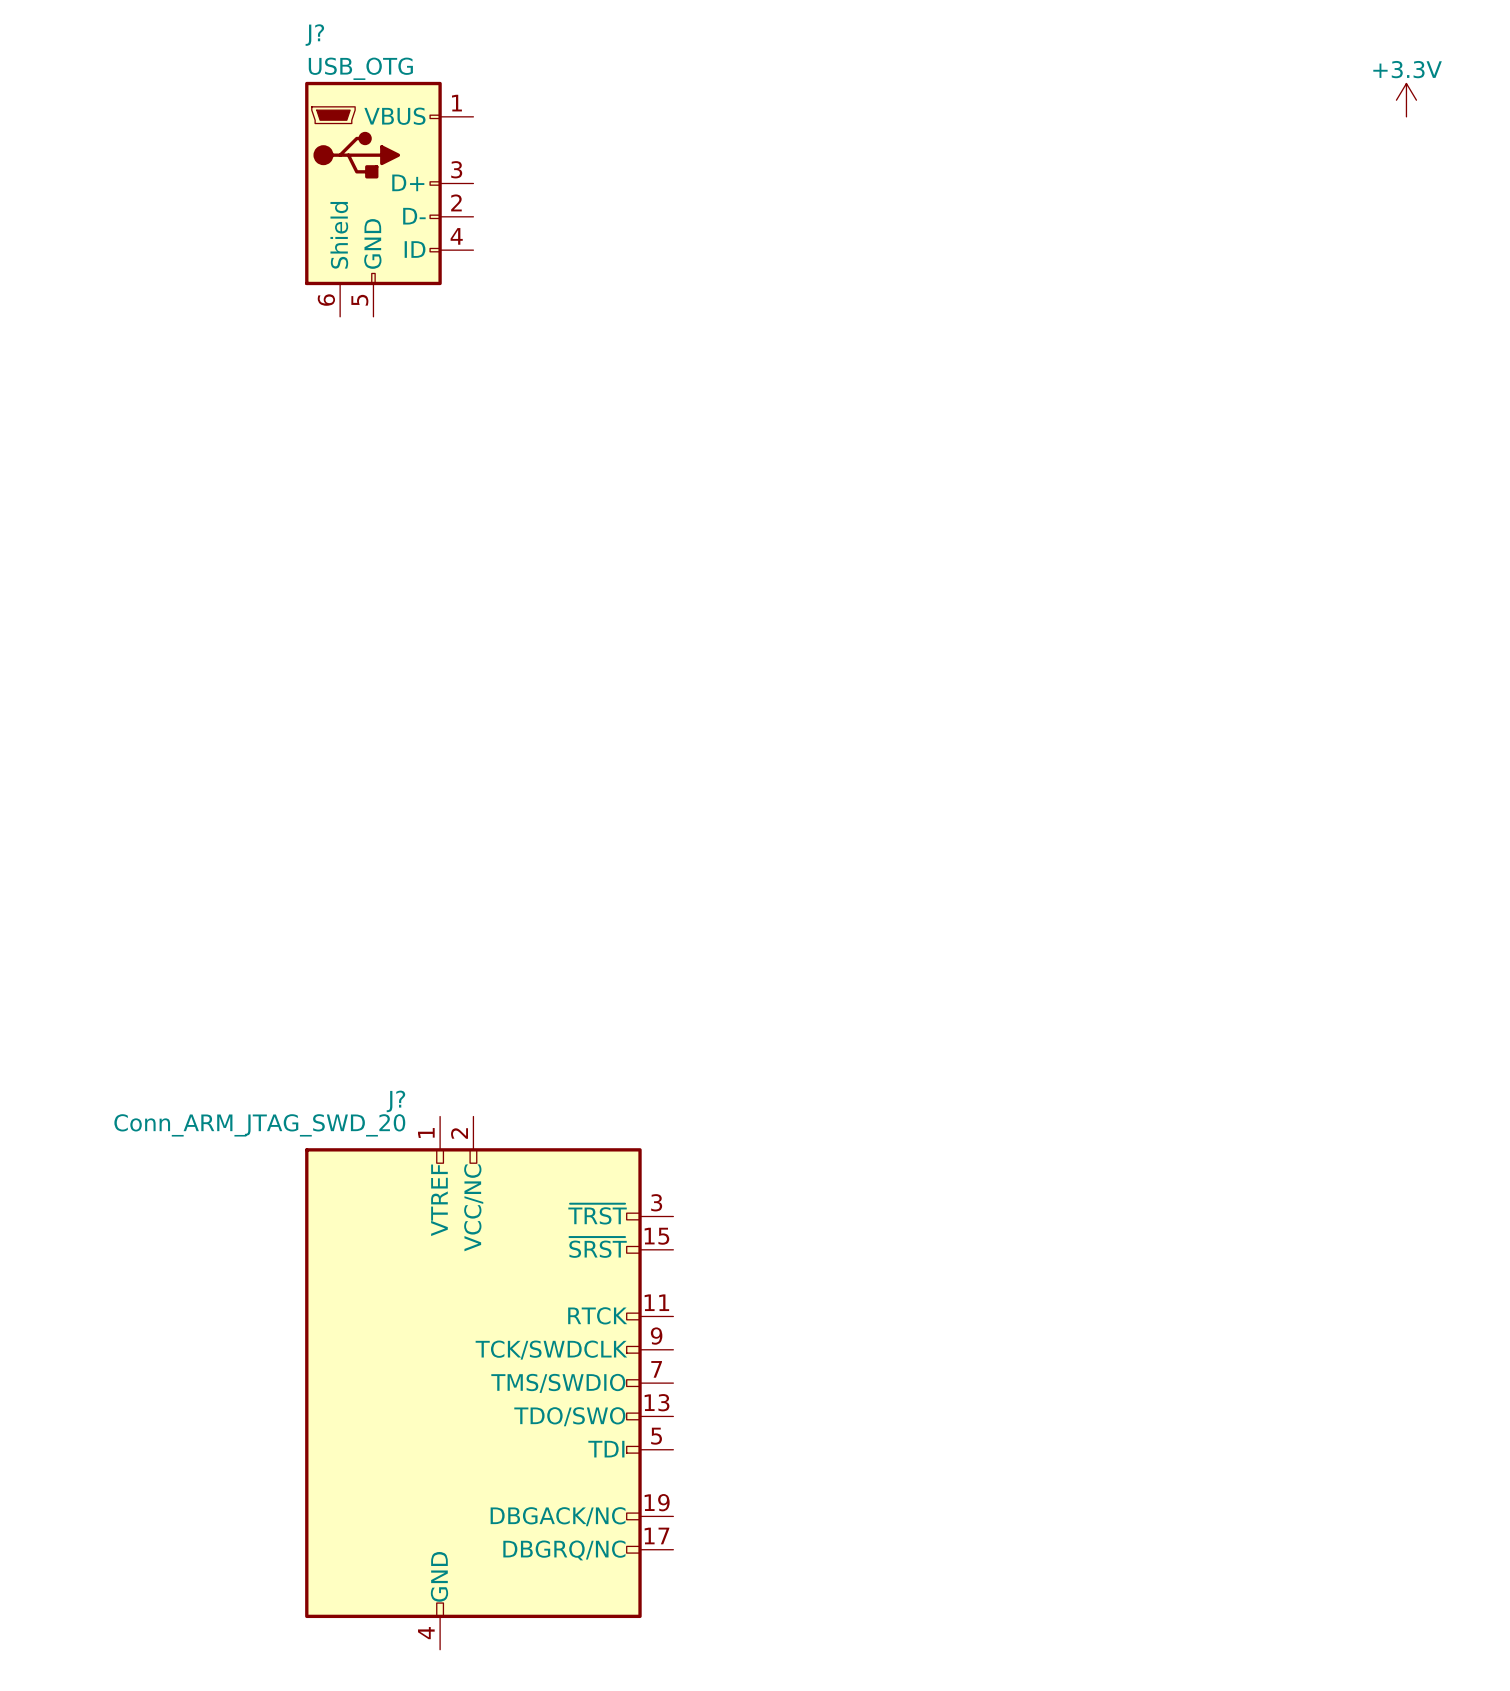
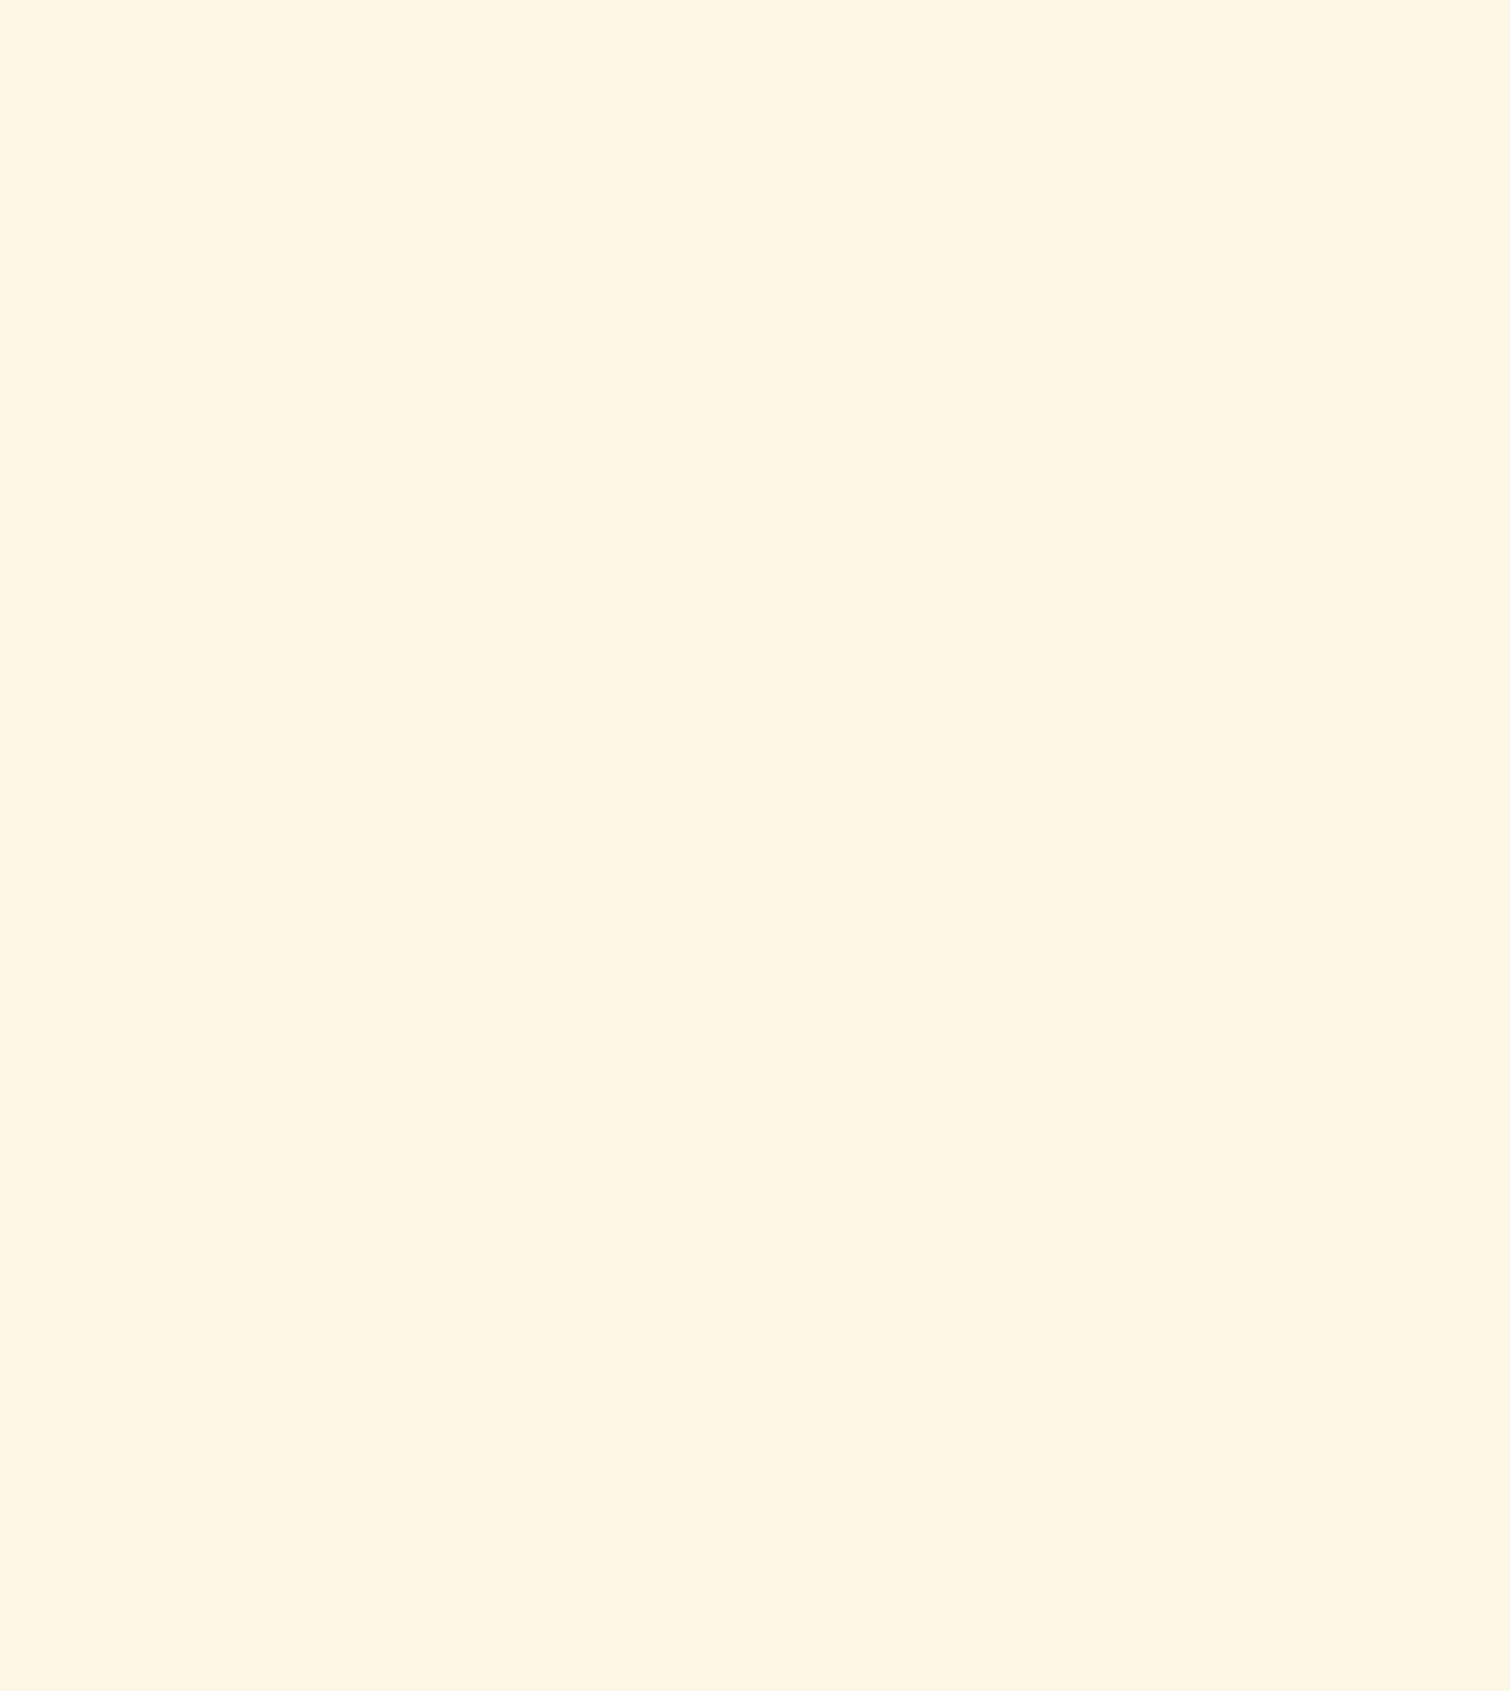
power symbol: +3.3V (1406, 100) -> none
J?: USB_OTG (389, 199) -> none
J?: Conn_ARM_JTAG_SWD_20 (489, 1383) -> none

